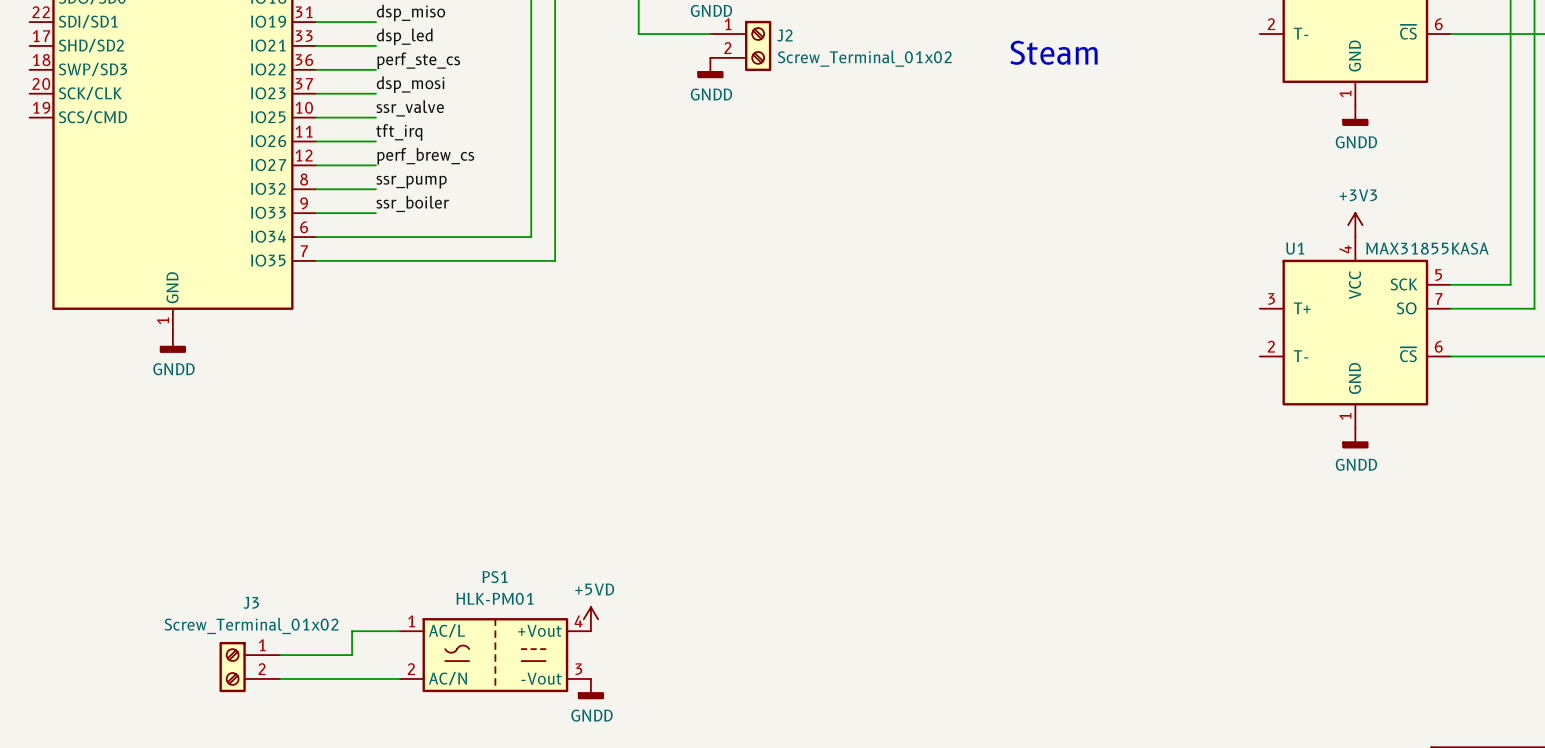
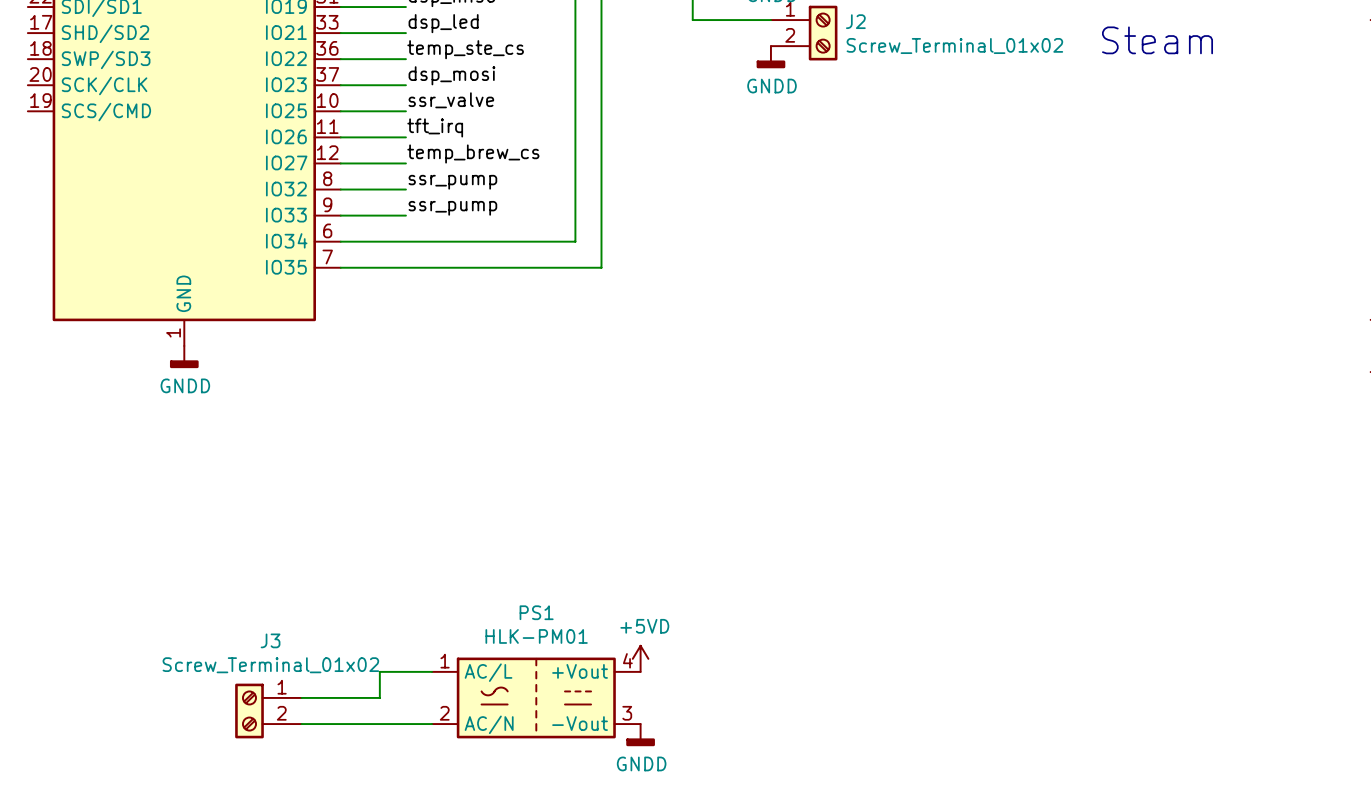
label: perf_ste_cs (418, 60) -> temp_ste_cs (465, 49)
label: perf_brew_cs (425, 156) -> temp_brew_cs (473, 153)
label: ssr_boiler (412, 203) -> ssr_pump (452, 208)

